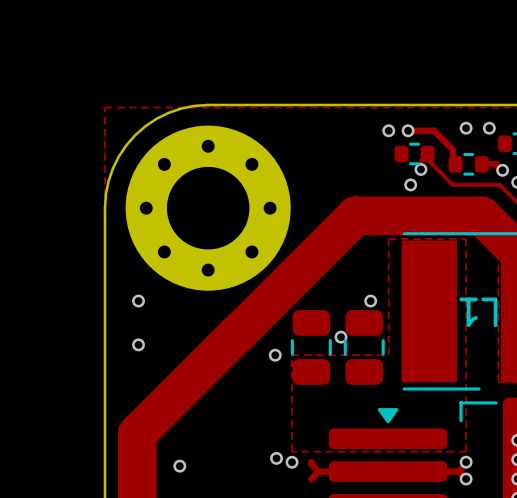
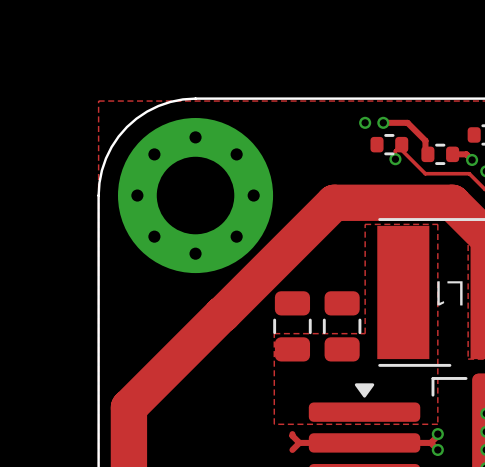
via: (466, 128) -> none
via: (489, 128) -> none
via: (410, 184) -> none
via: (138, 301) -> none
via: (370, 301) -> none
via: (341, 337) -> none
via: (138, 344) -> none
via: (275, 355) -> none
via: (276, 458) -> none
via: (292, 462) -> none
via: (179, 466) -> none

